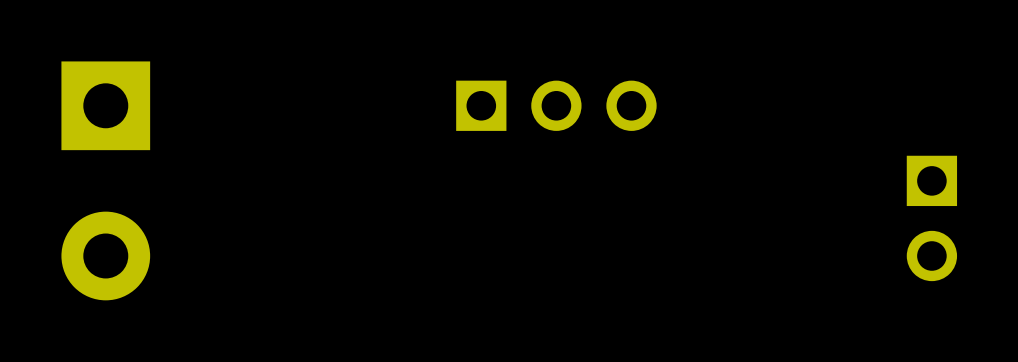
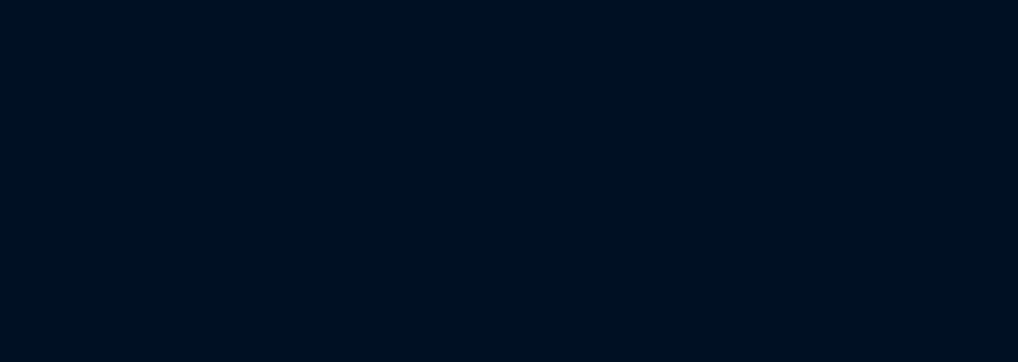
part: (556, 105) -> none
part: (105, 180) -> none
part: (931, 218) -> none

